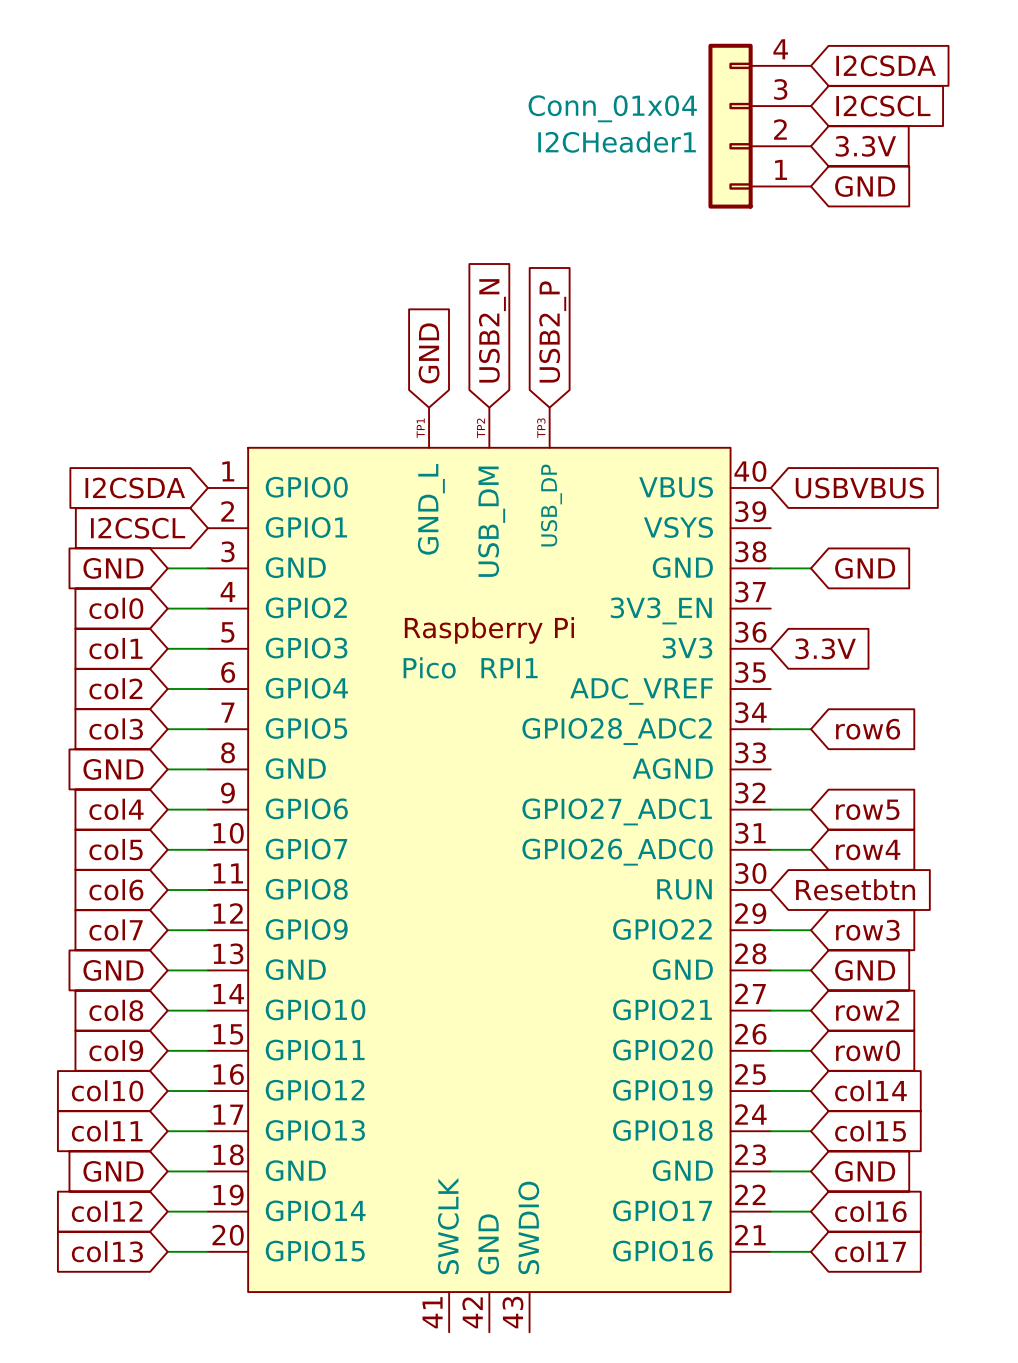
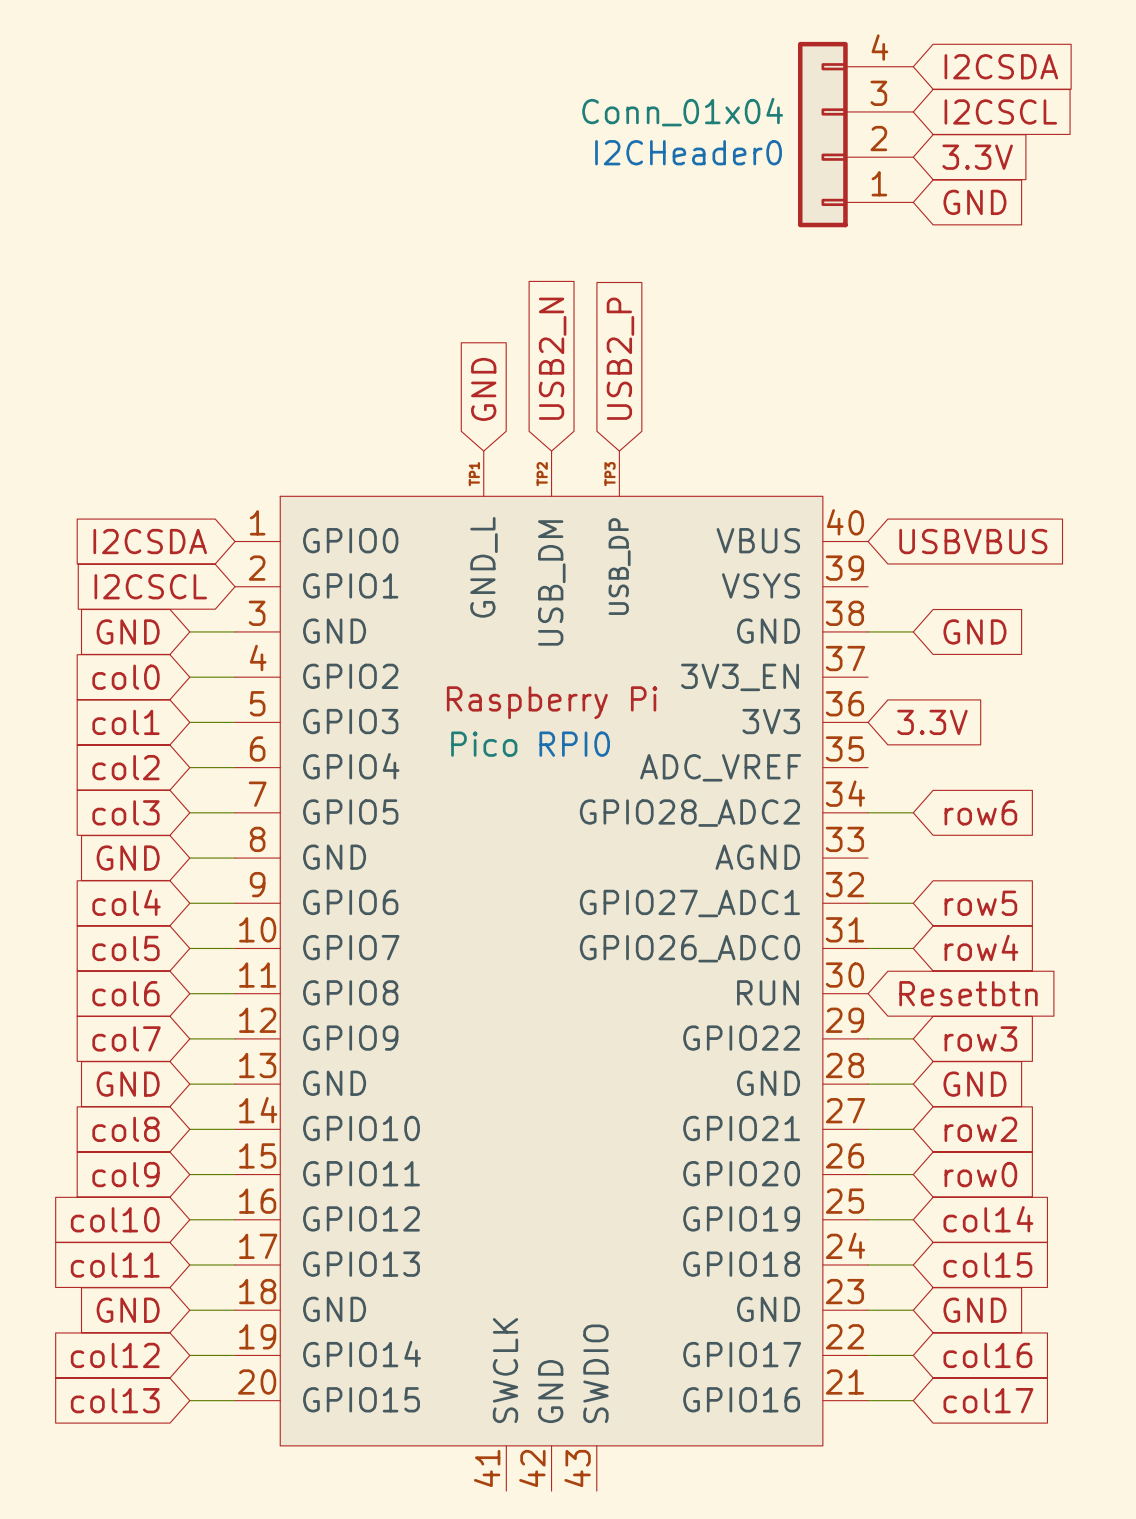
I2CHeader1 name: I2CHeader1 (617, 142) -> I2CHeader0 (688, 152)
RPI1 name: RPI1 (509, 668) -> RPI0 (574, 744)

